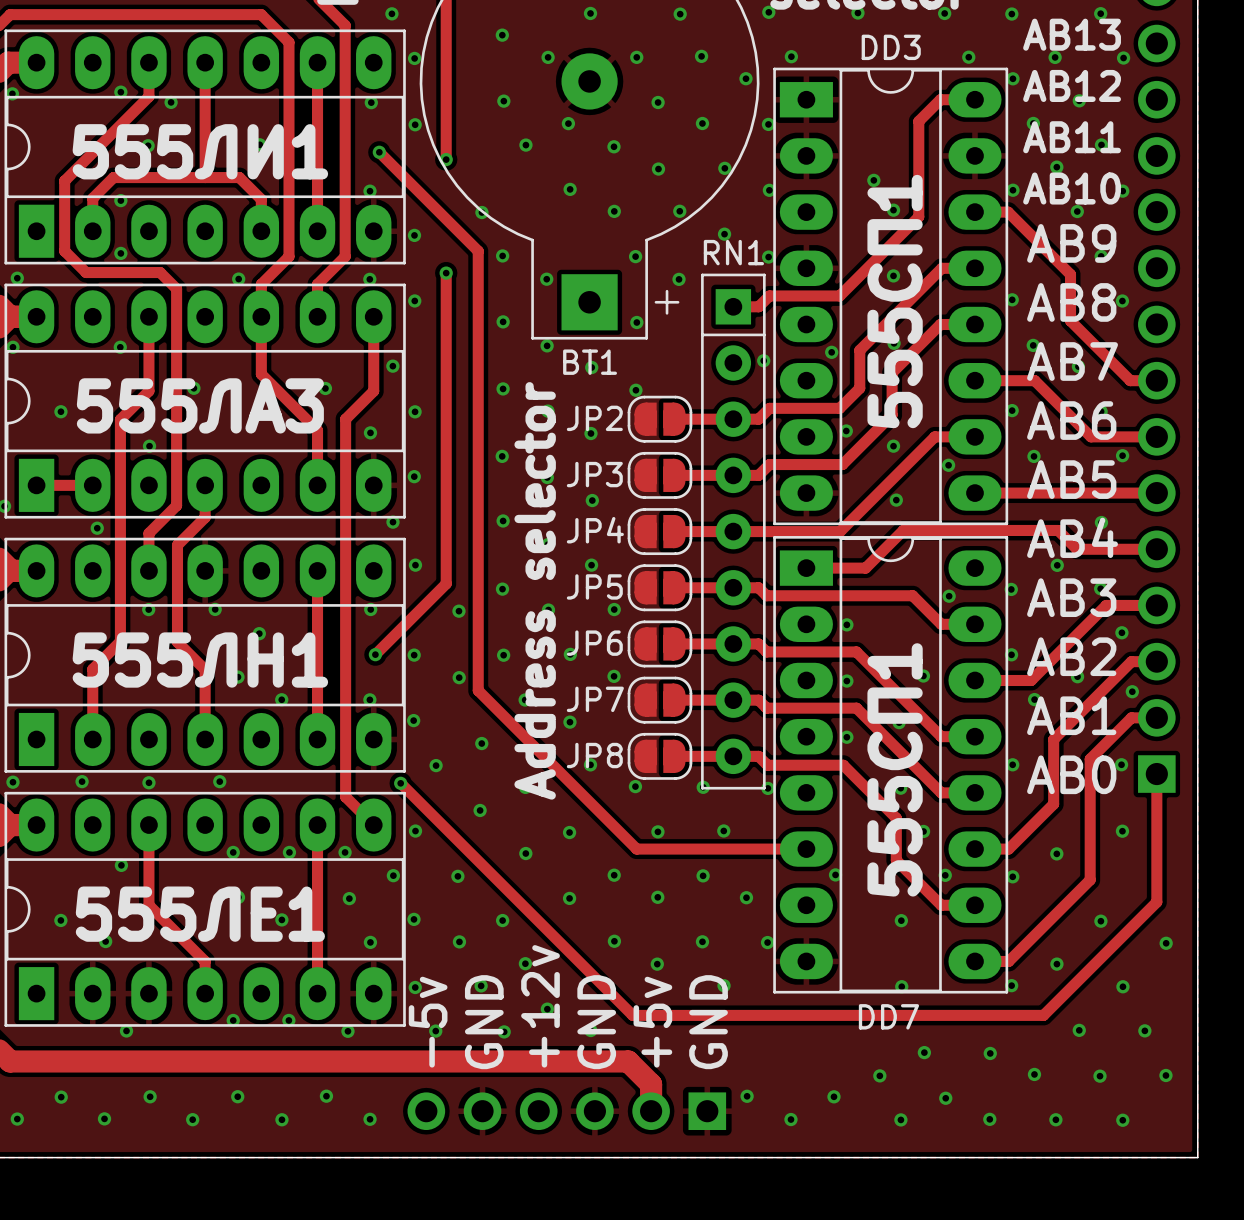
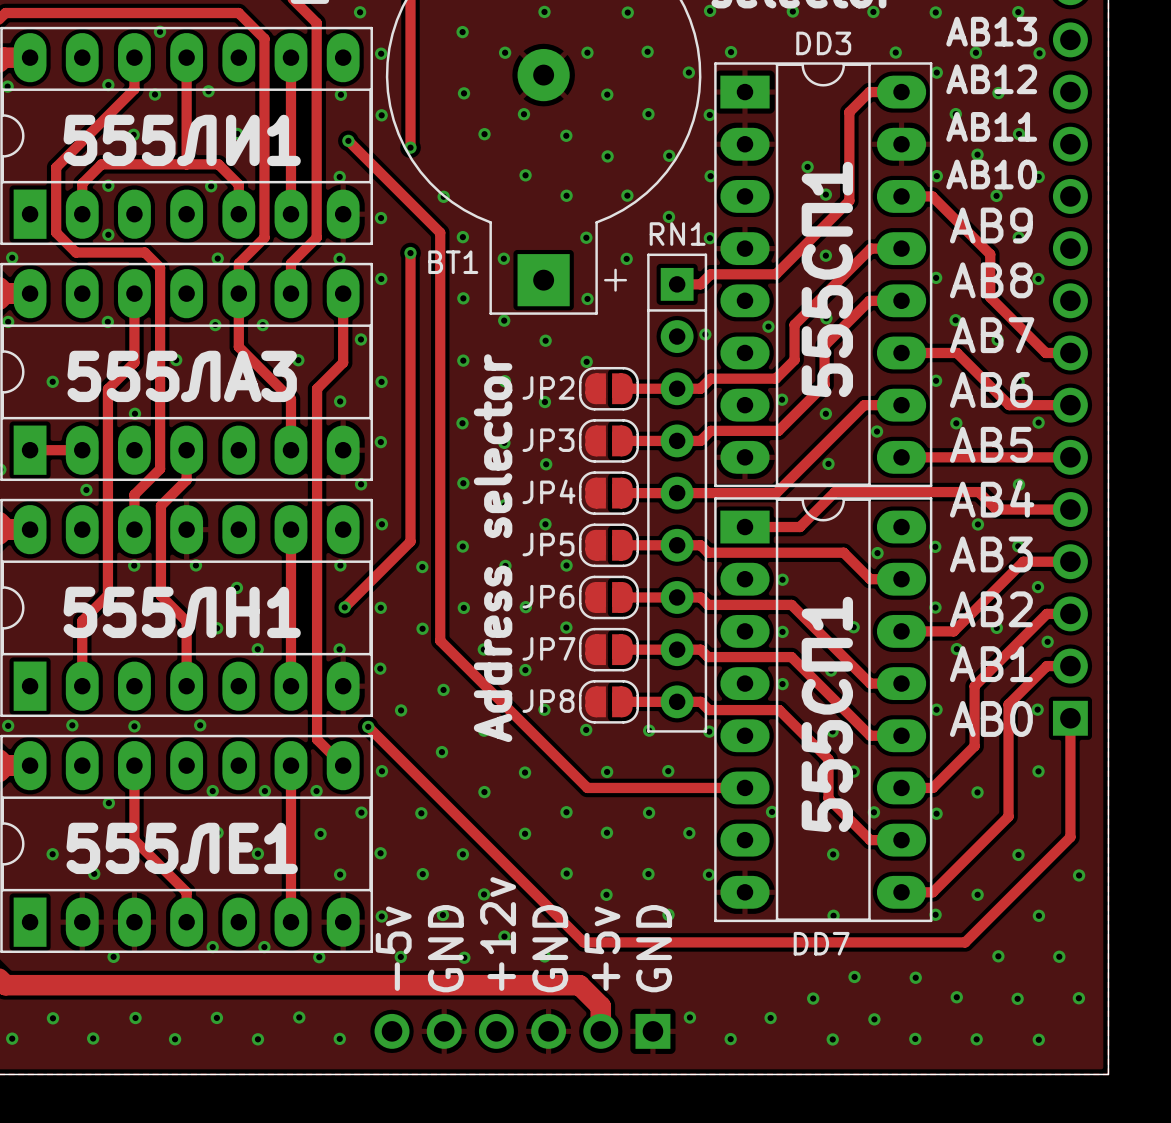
via: none -> (160, 31)
via: none -> (208, 91)
via: none -> (211, 186)
via: none -> (215, 325)
via: none -> (262, 325)
BT1 name position: BT1 (590, 362) -> BT1 (453, 262)

